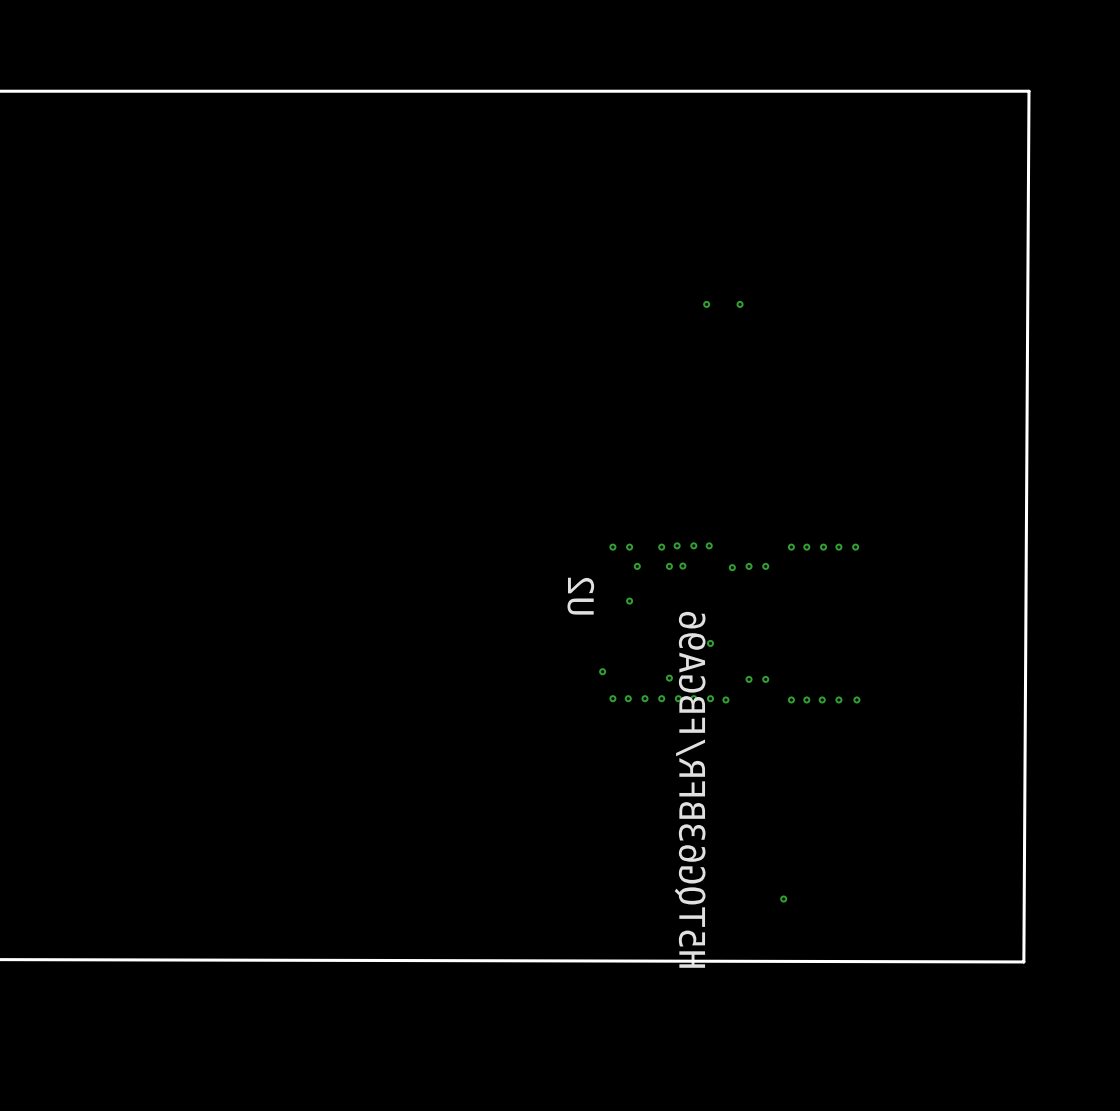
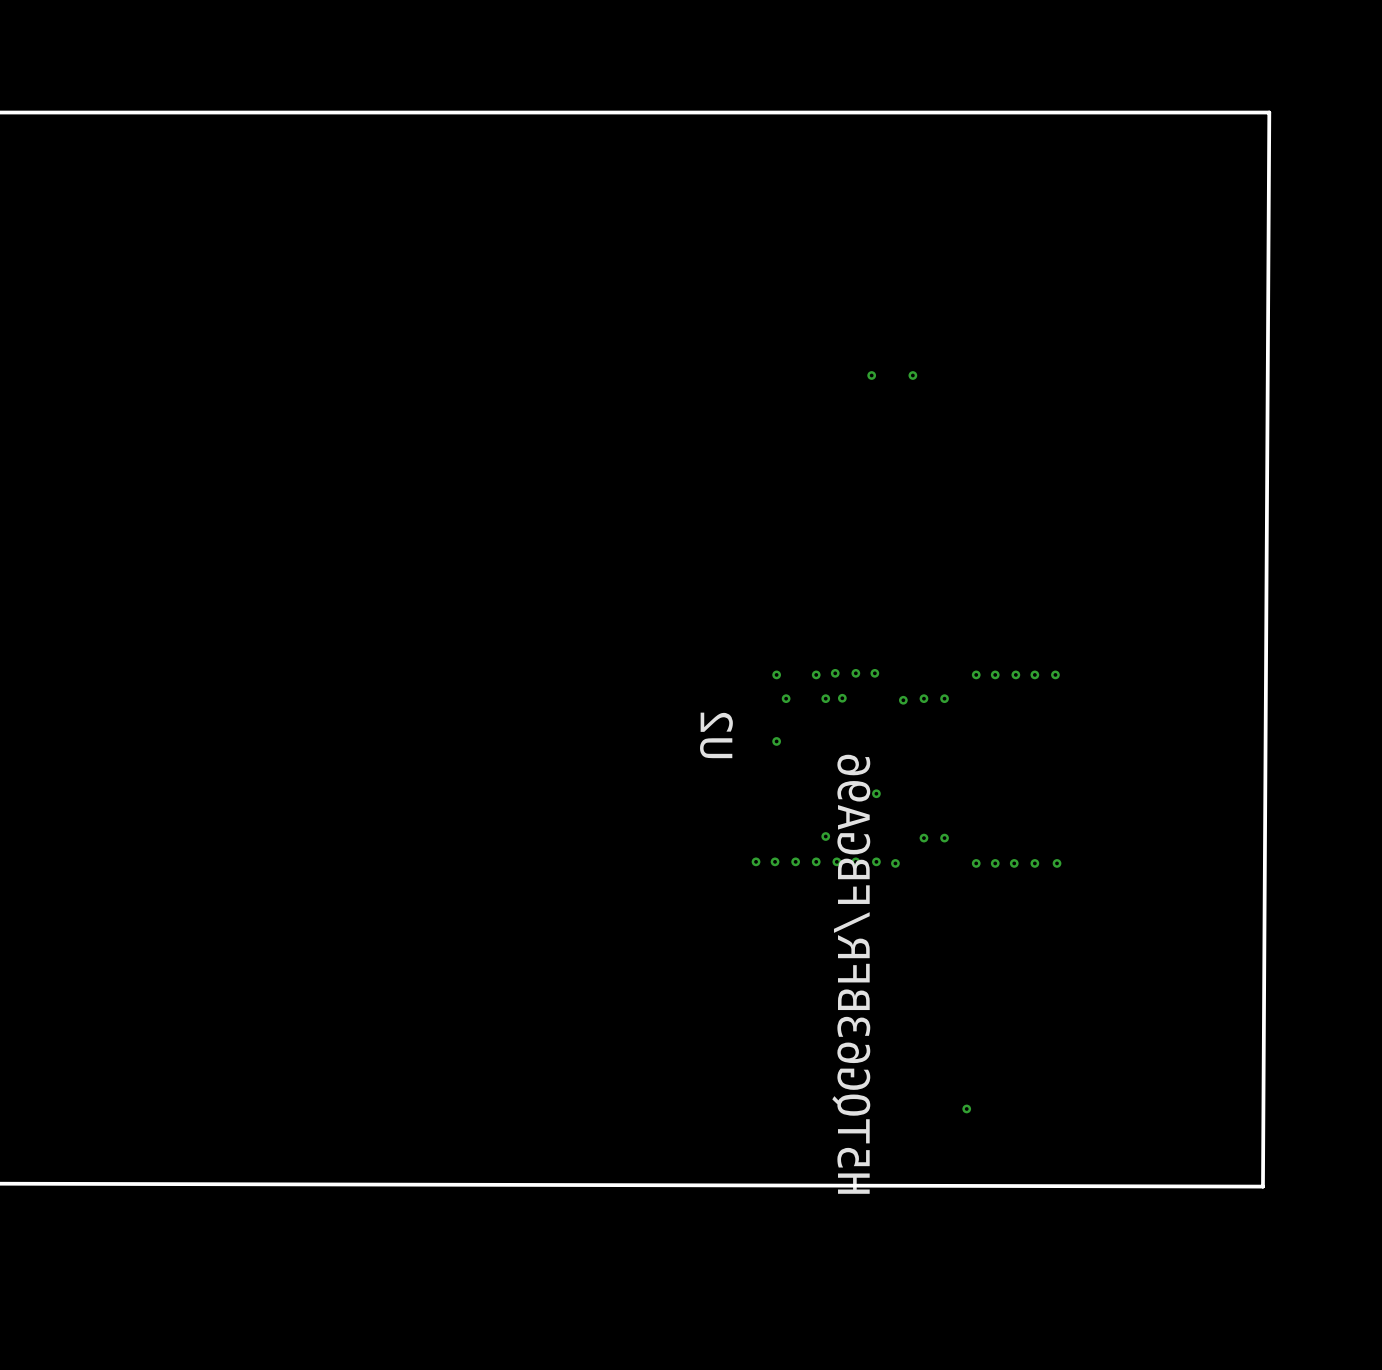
via: (612, 547) -> none
via: (602, 671) -> none

